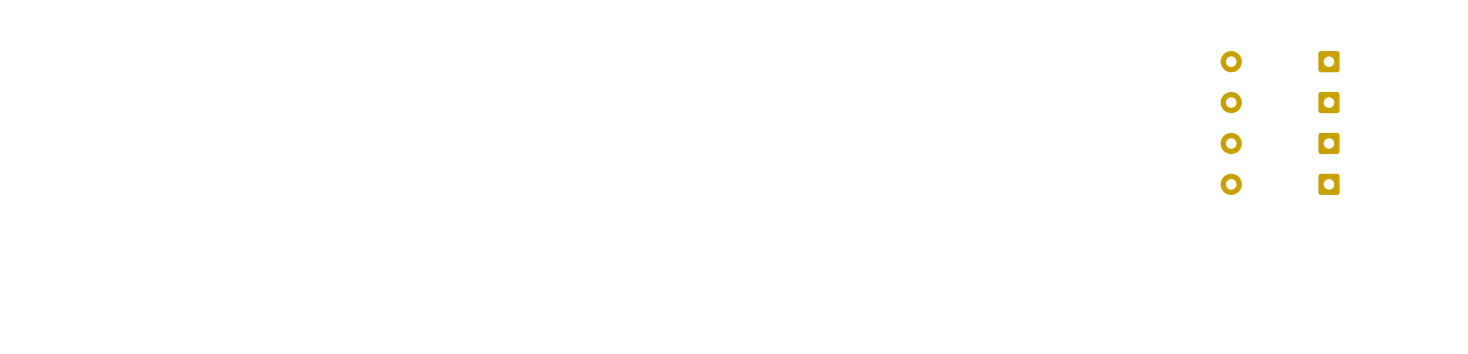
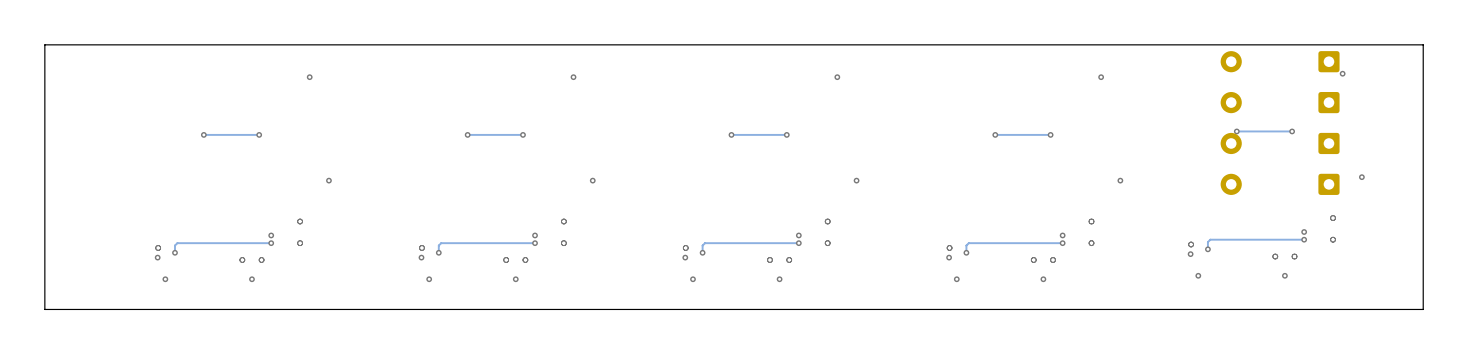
board edge: none -> (1423, 44) (44, 44) (44, 309) (1423, 309) (1423, 44)
via: none -> (1342, 73)
via: none -> (309, 77)
via: none -> (573, 77)
via: none -> (837, 77)
via: none -> (1101, 77)
via: none -> (1236, 131)
track: none -> (1292, 131) (1236, 131)
via: none -> (1292, 131)
via: none -> (203, 134)
track: none -> (259, 134) (203, 134)
via: none -> (259, 134)
via: none -> (467, 134)
track: none -> (522, 134) (467, 134)
via: none -> (522, 134)
via: none -> (731, 134)
track: none -> (786, 134) (731, 134)
via: none -> (786, 134)
via: none -> (995, 134)
track: none -> (1050, 134) (995, 134)
via: none -> (1050, 134)
via: none -> (1361, 177)
via: none -> (328, 180)
via: none -> (592, 180)
via: none -> (856, 180)
via: none -> (1120, 180)
via: none -> (1333, 218)
via: none -> (300, 221)
via: none -> (563, 221)
via: none -> (827, 221)
via: none -> (1091, 221)
via: none -> (1304, 232)
via: none -> (271, 235)
via: none -> (535, 235)
via: none -> (798, 235)
via: none -> (1062, 235)
track: none -> (1304, 239) (1210, 239) (1207, 242) (1207, 249)
via: none -> (1304, 239)
via: none -> (1333, 239)
track: none -> (271, 243) (177, 243) (174, 245) (174, 252)
via: none -> (271, 243)
via: none -> (300, 243)
track: none -> (535, 243) (441, 243) (438, 245) (438, 252)
via: none -> (535, 243)
via: none -> (563, 243)
track: none -> (798, 243) (705, 243) (702, 245) (702, 252)
via: none -> (798, 243)
via: none -> (827, 243)
track: none -> (1062, 243) (968, 243) (966, 245) (966, 252)
via: none -> (1062, 243)
via: none -> (1091, 243)
via: none -> (1191, 244)
via: none -> (158, 247)
via: none -> (421, 247)
via: none -> (685, 247)
via: none -> (949, 247)
via: none -> (1207, 249)
via: none -> (174, 252)
via: none -> (438, 252)
via: none -> (702, 252)
via: none -> (966, 252)
via: none -> (1190, 254)
via: none -> (1275, 256)
via: none -> (1294, 256)
via: none -> (157, 257)
via: none -> (421, 257)
via: none -> (685, 257)
via: none -> (949, 257)
via: none -> (242, 260)
via: none -> (261, 260)
via: none -> (506, 260)
via: none -> (525, 260)
via: none -> (769, 260)
via: none -> (789, 260)
via: none -> (1033, 260)
via: none -> (1053, 260)
via: none -> (1198, 275)
via: none -> (1284, 275)
via: none -> (165, 279)
via: none -> (251, 279)
via: none -> (429, 279)
via: none -> (515, 279)
via: none -> (692, 279)
via: none -> (779, 279)
via: none -> (956, 279)
via: none -> (1043, 279)

